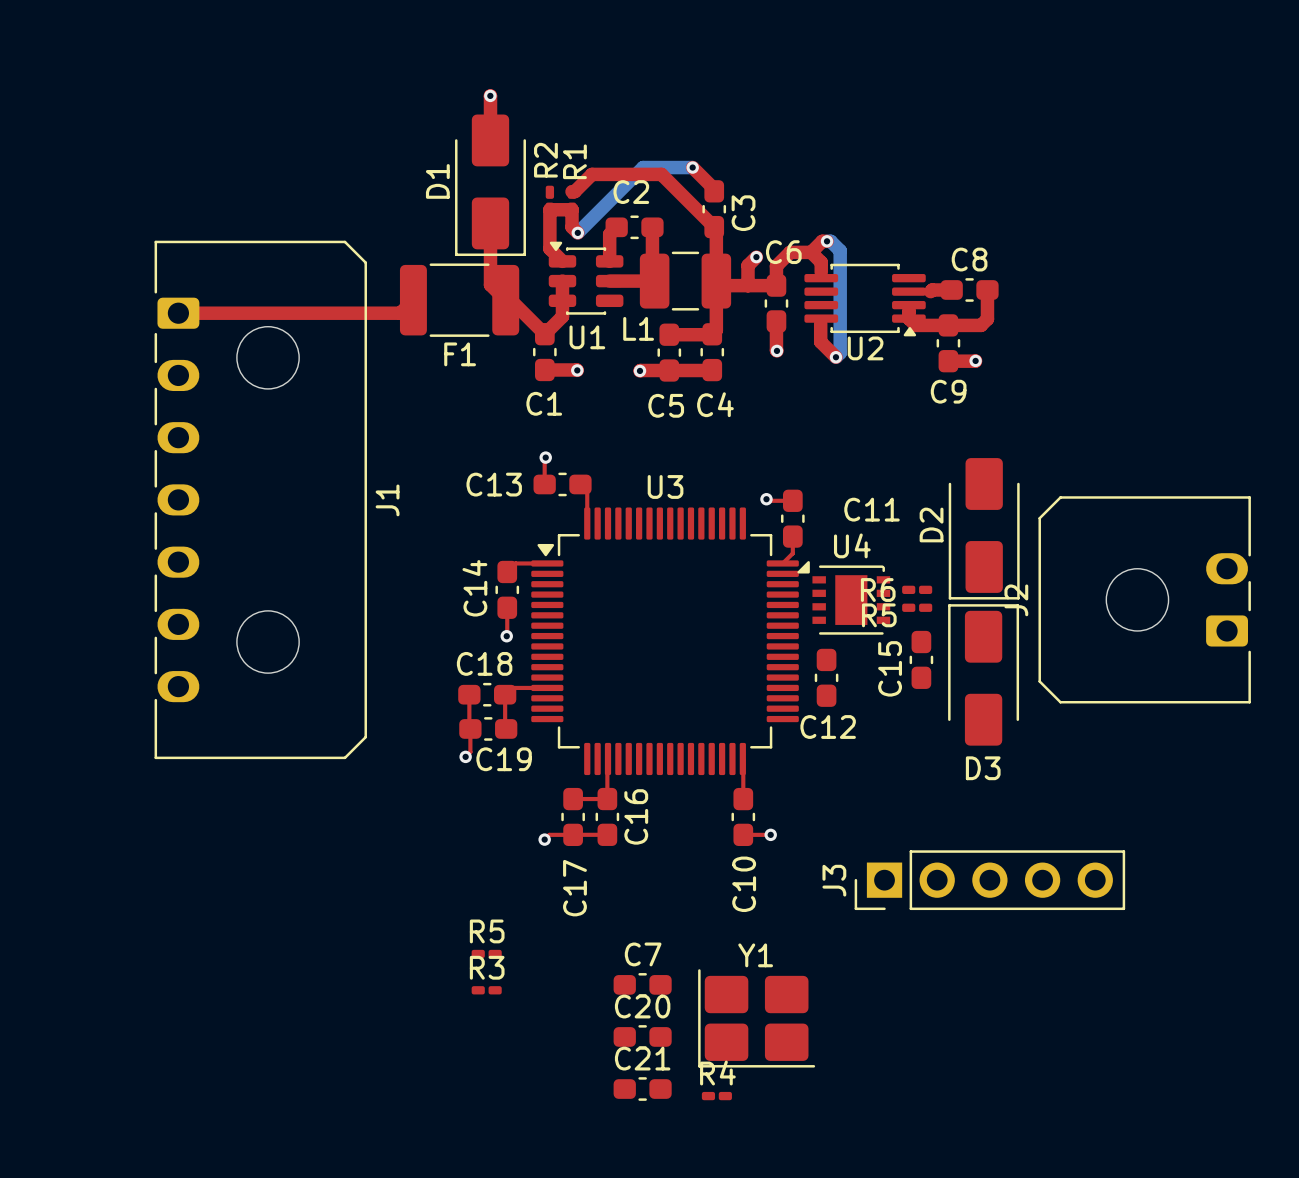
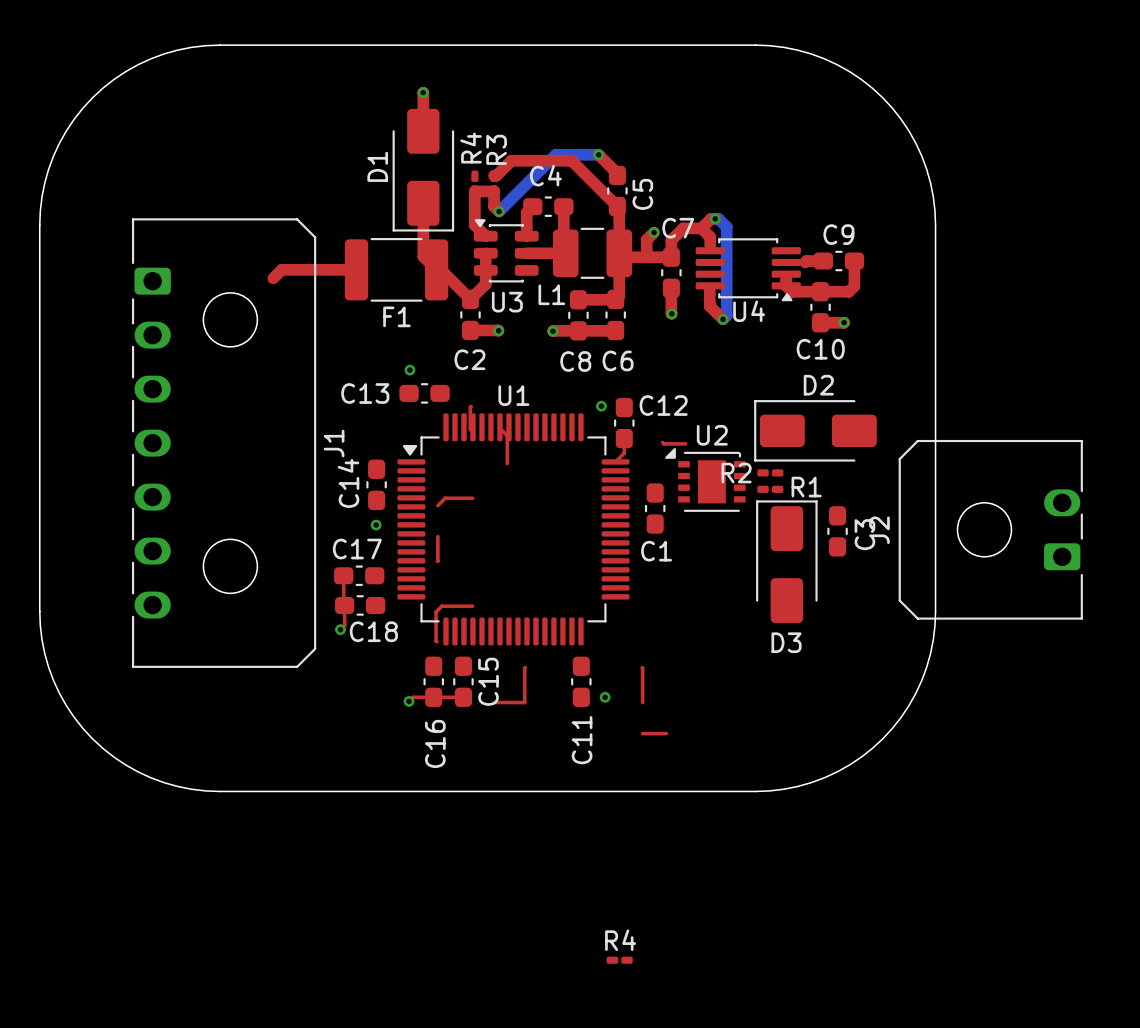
board edge: none -> (219, 45) (769, 45) (797, 50) (824, 58) (849, 71) (882, 97) (909, 131) (921, 156) (930, 183) (935, 225) (934, 625) (930, 653) (921, 680) (901, 717) (882, 738) (849, 764) (824, 777) (783, 789) (755, 791) (205, 790) (177, 786) (138, 771) (113, 757) (92, 738) (74, 717) (59, 693) (44, 653) (40, 625) (39, 225) (41, 196) (48, 169) (59, 143) (82, 108) (102, 88) (125, 71) (150, 58) (177, 50) (219, 45)
R2 name: R2 (545, 160) -> R4 (471, 148)
R1 name: R1 (574, 161) -> R3 (496, 149)
C2 name: C2 (631, 192) -> C4 (545, 175)
C3 name: C3 (743, 213) -> C5 (642, 194)
C6 name: C6 (783, 252) -> C7 (678, 228)
C8 name: C8 (969, 259) -> C9 (838, 234)
top track: none -> (356, 269) (281, 269) (273, 278)
top track: (412, 301) (400, 313) (178, 313) -> none
U1 name: U1 (587, 337) -> U3 (507, 302)
U2 name: U2 (865, 348) -> U4 (749, 311)
C9 name: C9 (948, 391) -> C10 (820, 349)
C1 name: C1 (544, 403) -> C2 (469, 359)
C4 name: C4 (715, 404) -> C6 (618, 360)
C5 name: C5 (666, 405) -> C8 (575, 361)
via: none -> (409, 370)
via: (545, 457) -> none
via: none -> (601, 406)
C13 position: (562, 484) -> (424, 393)
via: (766, 499) -> none
C11 name rotation: 0° (871, 509) -> 90° counterclockwise (582, 740)
C11 name position: C11 (871, 509) -> C11 (582, 740)
C11 position: (792, 518) -> (581, 681)
D2 rotation: 0° (984, 528) -> 90° clockwise (815, 430)
R2: none -> (770, 472)
top track: (792, 536) (792, 553) (782, 563) -> (624, 438) (624, 453) (615, 461)
U2: none -> (705, 479)
R1: none -> (770, 489)
C1: none -> (655, 508)
C14 position: (507, 589) -> (376, 484)
R6: (917, 589) -> none
via: none -> (376, 525)
U4: (843, 597) -> none
U1: none -> (513, 529)
C3: none -> (837, 531)
R5: (917, 607) -> none
via: (506, 636) -> none
U3: (665, 641) -> none
C15 position: (921, 659) -> (463, 681)
C18 name position: C18 (484, 663) -> C18 (373, 631)
C15 name position: C15 (890, 668) -> C15 (488, 681)
D3 position: (983, 674) -> (786, 561)
C12 position: (826, 677) -> (624, 423)
top track: (469, 694) (470, 752) (465, 756) -> (343, 575) (344, 625) (340, 629)
C18 position: (487, 694) -> (360, 605)
via: none -> (340, 629)
C12 name position: C12 (828, 727) -> C12 (663, 405)
C19: (488, 728) -> none
via: (465, 756) -> none
top track: none -> (433, 697) (463, 697)
top track: none -> (433, 697) (413, 697) (409, 701)
via: none -> (605, 697)
via: none -> (409, 701)
C17 rotation: 0° (573, 816) -> 90° clockwise (359, 575)
C17 position: (573, 816) -> (359, 575)
C16 position: (607, 816) -> (433, 681)
C16 name position: C16 (636, 816) -> C16 (435, 743)
C10: (743, 816) -> none
via: (770, 834) -> none
via: (544, 839) -> none
J3: (989, 880) -> none
C17 name position: C17 (574, 888) -> C17 (357, 549)
R5: (486, 953) -> none
C7: (642, 984) -> none
R3: (486, 990) -> none
Y1: (756, 1018) -> none
C20: (642, 1036) -> none
C21: (642, 1089) -> none

